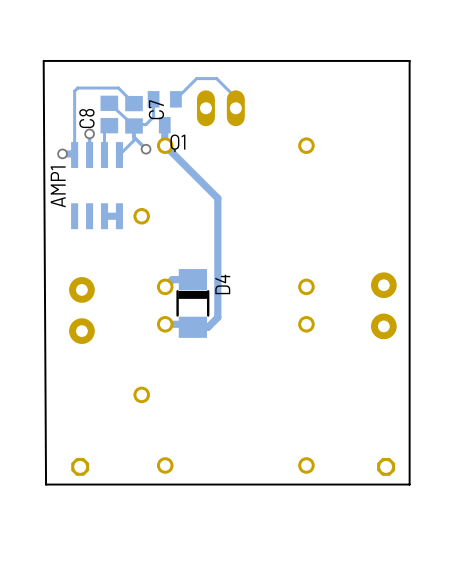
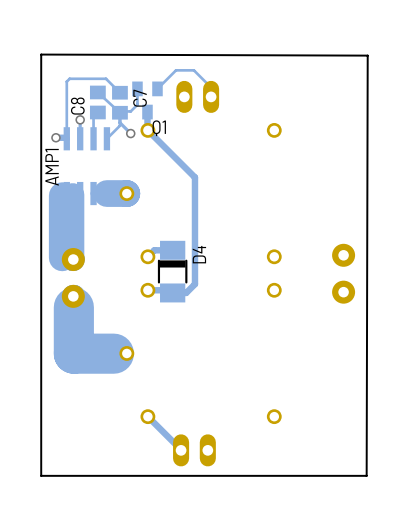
board edge: (409, 60) (43, 60) (46, 484) (409, 484) (409, 60) -> (41, 54) (367, 55) (366, 475) (41, 475) (41, 54)
track: none -> (126, 193) (106, 193)
track: none -> (72, 194) (72, 259) (73, 259) (73, 259) (62, 257) (62, 195)
track: none -> (73, 296) (73, 353) (126, 353)
track: none -> (147, 416) (181, 450)
part: (80, 466) -> none
part: (386, 466) -> none
part: none -> (194, 450)

